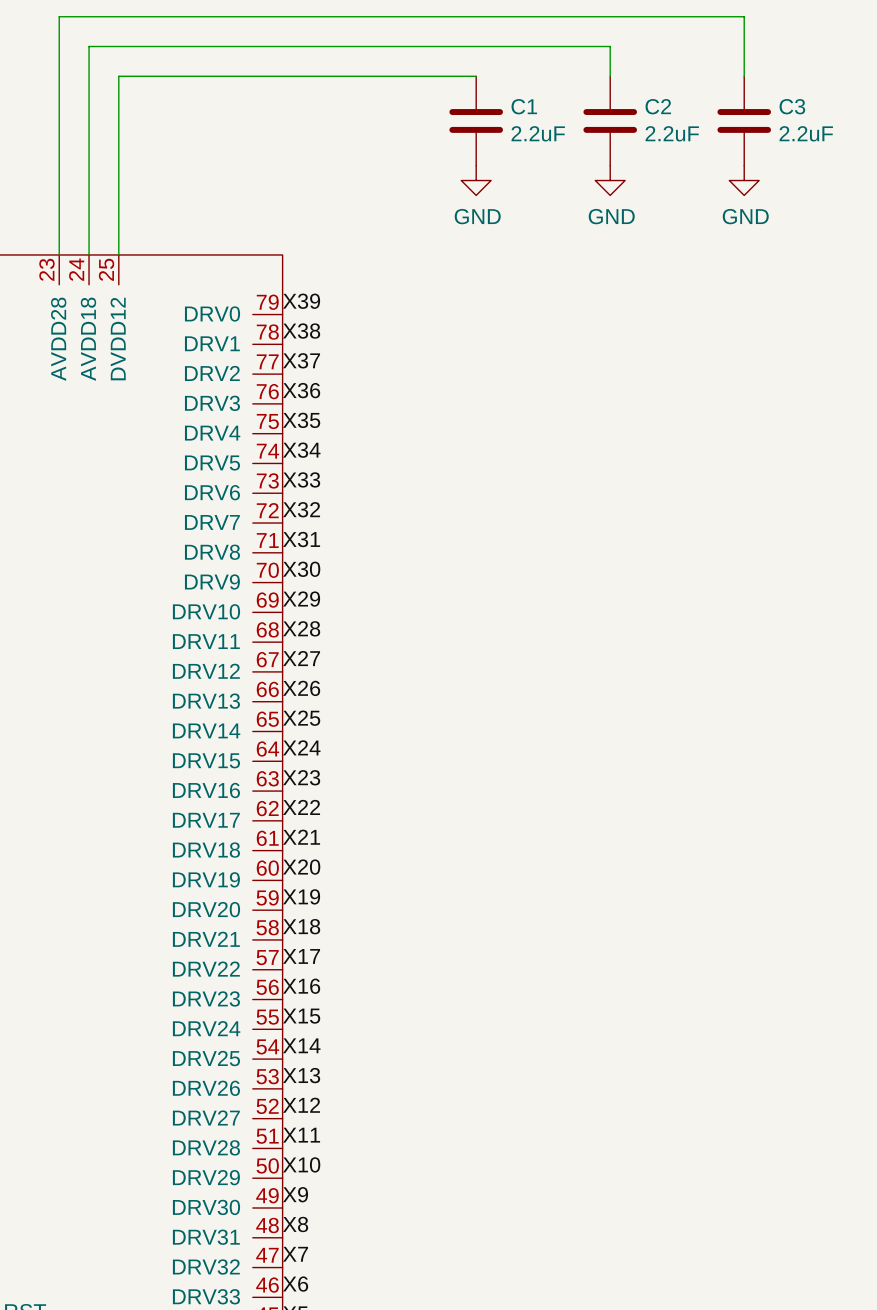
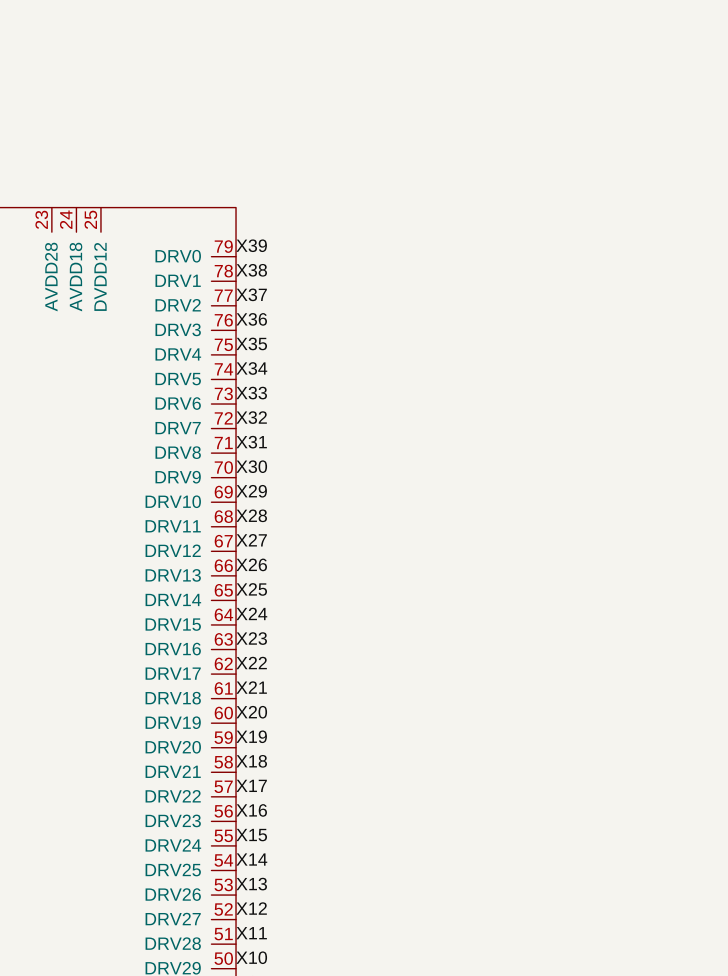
wire: (476, 76) (118, 76) (118, 254) -> none
wire: (610, 76) (610, 46) (89, 46) (89, 254) -> none
wire: (744, 76) (744, 16) (59, 16) (59, 254) -> none
C1: 2.2uF (476, 120) -> none
C2: 2.2uF (610, 120) -> none
C3: 2.2uF (744, 120) -> none
power symbol: GND (476, 180) -> none
power symbol: GND (610, 180) -> none
power symbol: GND (744, 180) -> none

